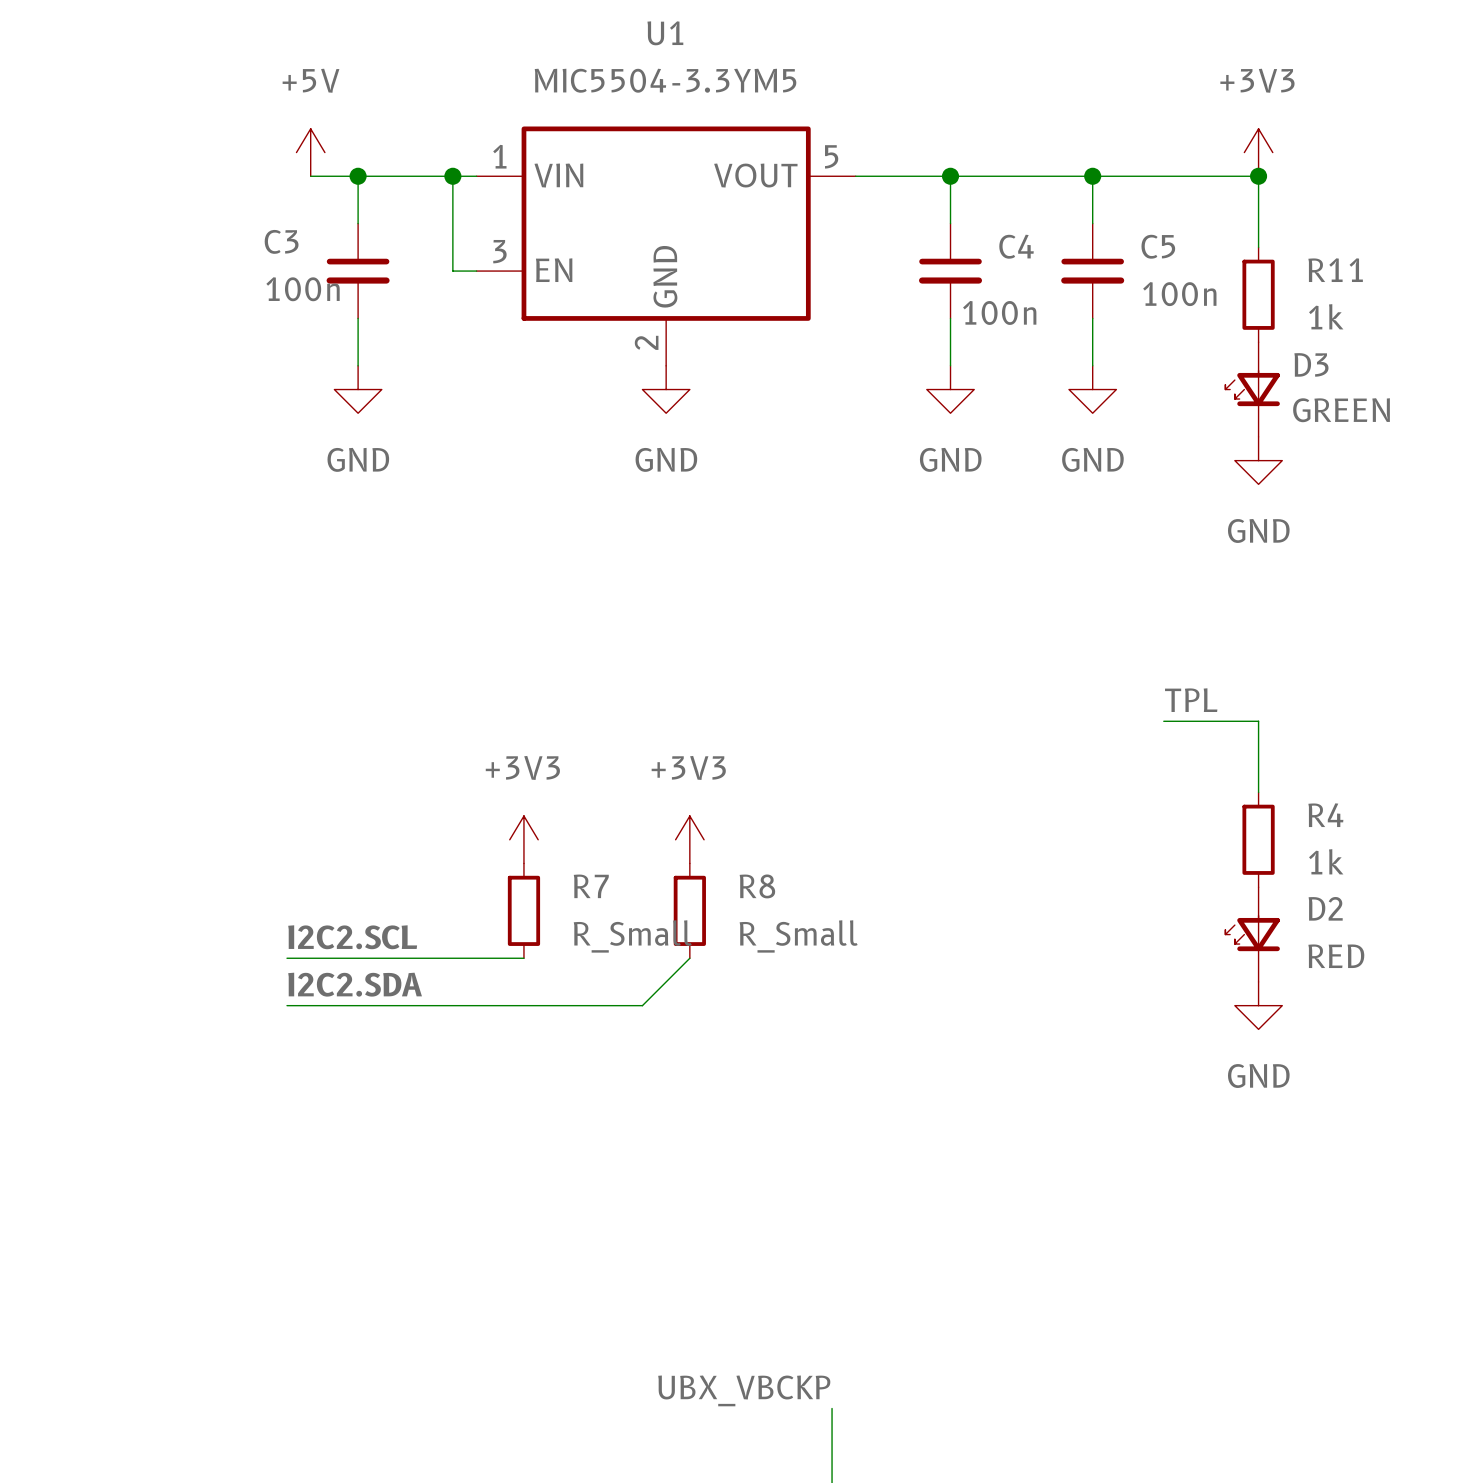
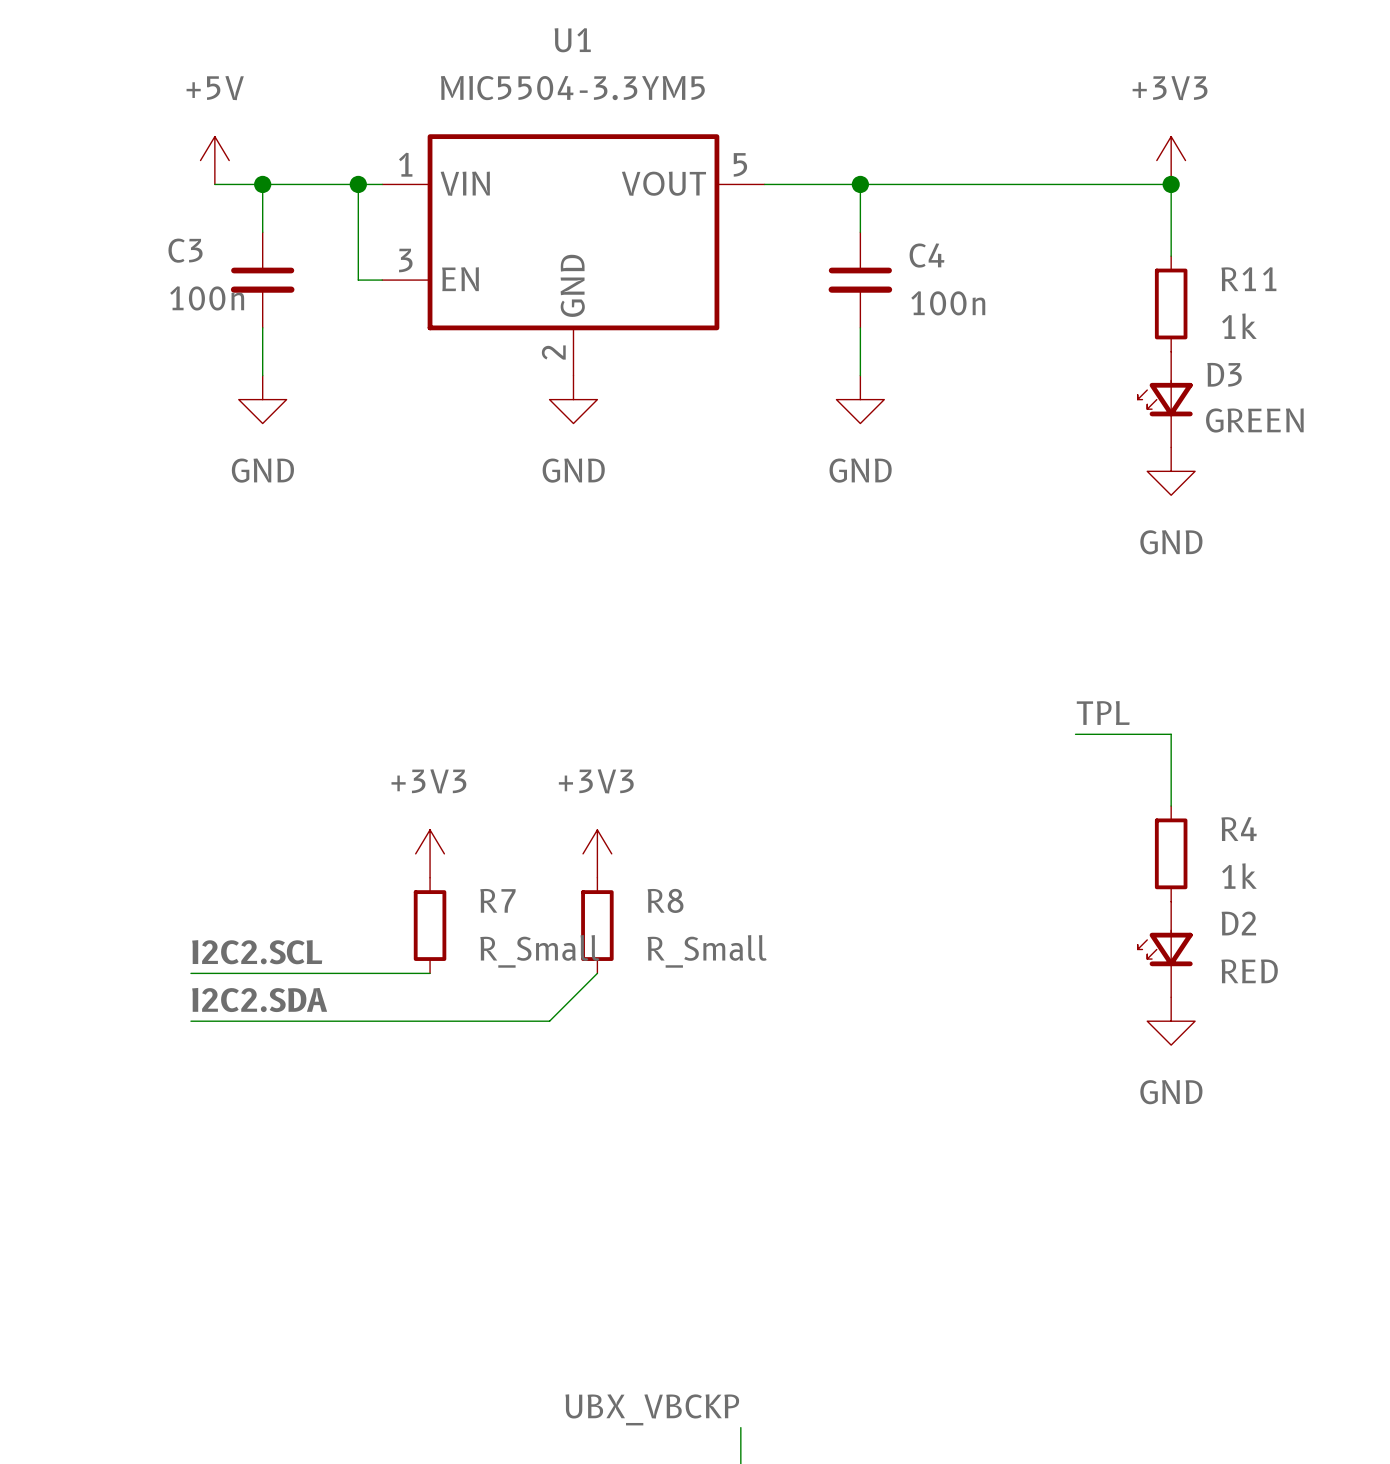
wire: (1092, 176) (1092, 223) -> none
junction: (1092, 176) -> none
C5: 100n (1092, 271) -> none
C4 value position: 100n (999, 312) -> 100n (948, 303)
wire: (1092, 318) (1092, 365) -> none
power symbol: GND (1092, 389) -> none

